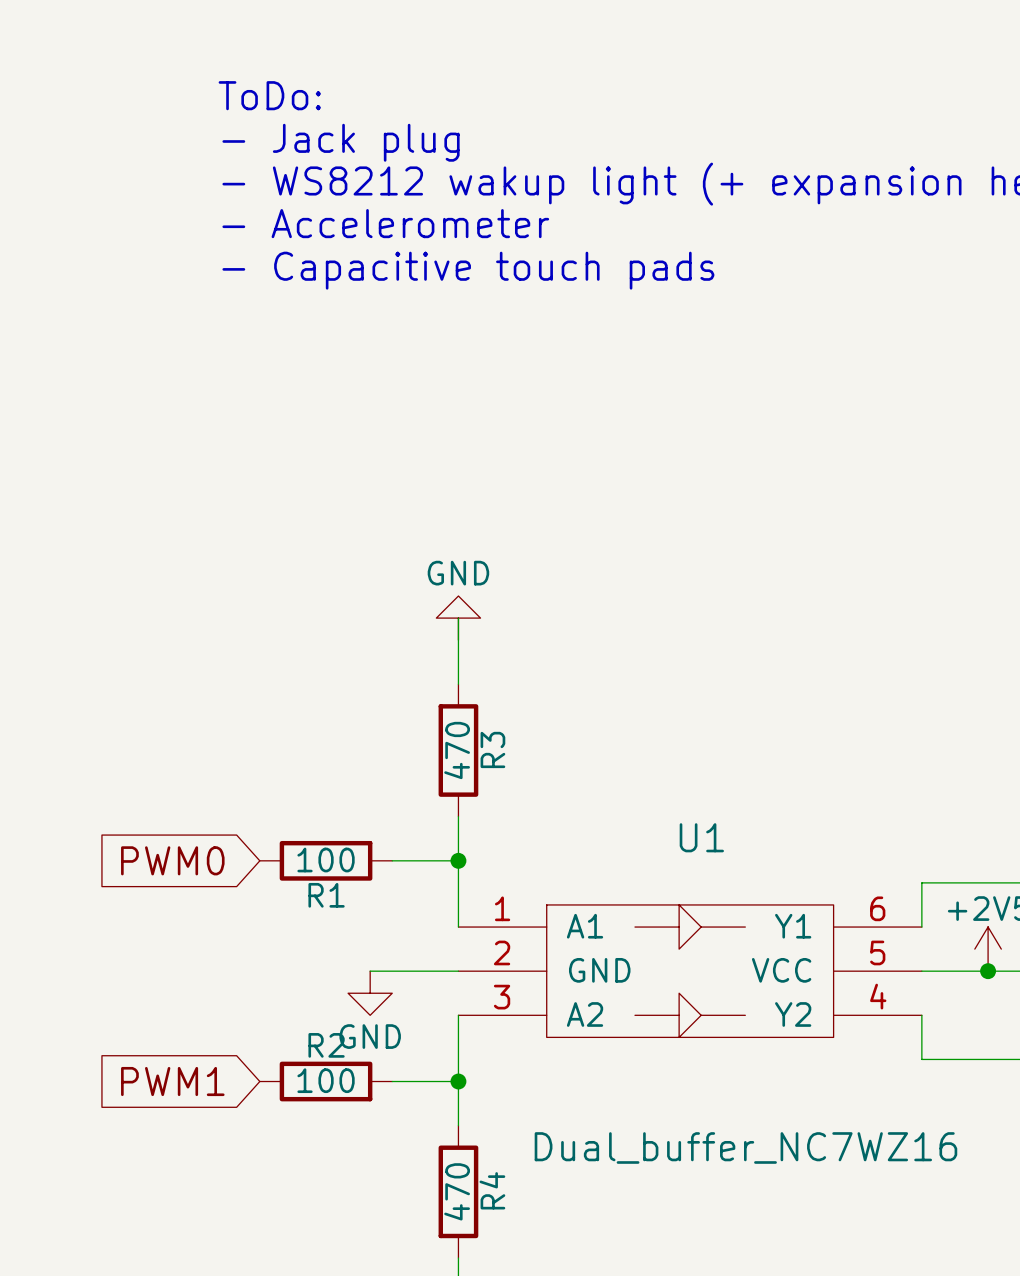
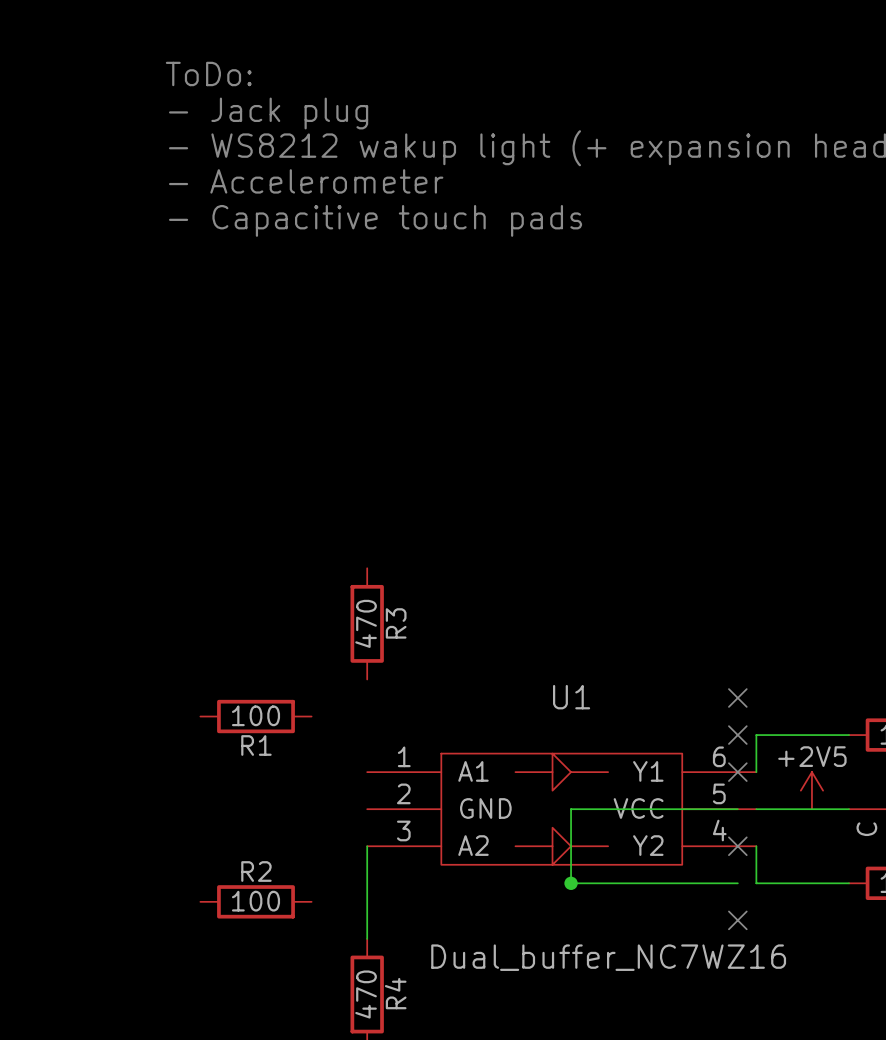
wire: (458, 618) (458, 684) -> none
power symbol: GND (458, 618) -> none
wire: (458, 816) (458, 927) -> none
no-connect mark: none -> (737, 697)
global label: PWM0 (172, 860) -> none
wire: (392, 860) (458, 860) -> none
junction: (458, 860) -> none
no-connect mark: none -> (737, 735)
no-connect mark: none -> (737, 772)
wire: (370, 971) (458, 971) -> none
wire: none -> (737, 809) (571, 809) (571, 883) (737, 883)
junction: (988, 971) -> none
power symbol: GND (370, 993) -> none
no-connect mark: none -> (737, 846)
junction: none -> (571, 883)
global label: PWM1 (172, 1081) -> none
wire: (392, 1081) (458, 1081) -> none
junction: (458, 1081) -> none
no-connect mark: none -> (737, 920)

